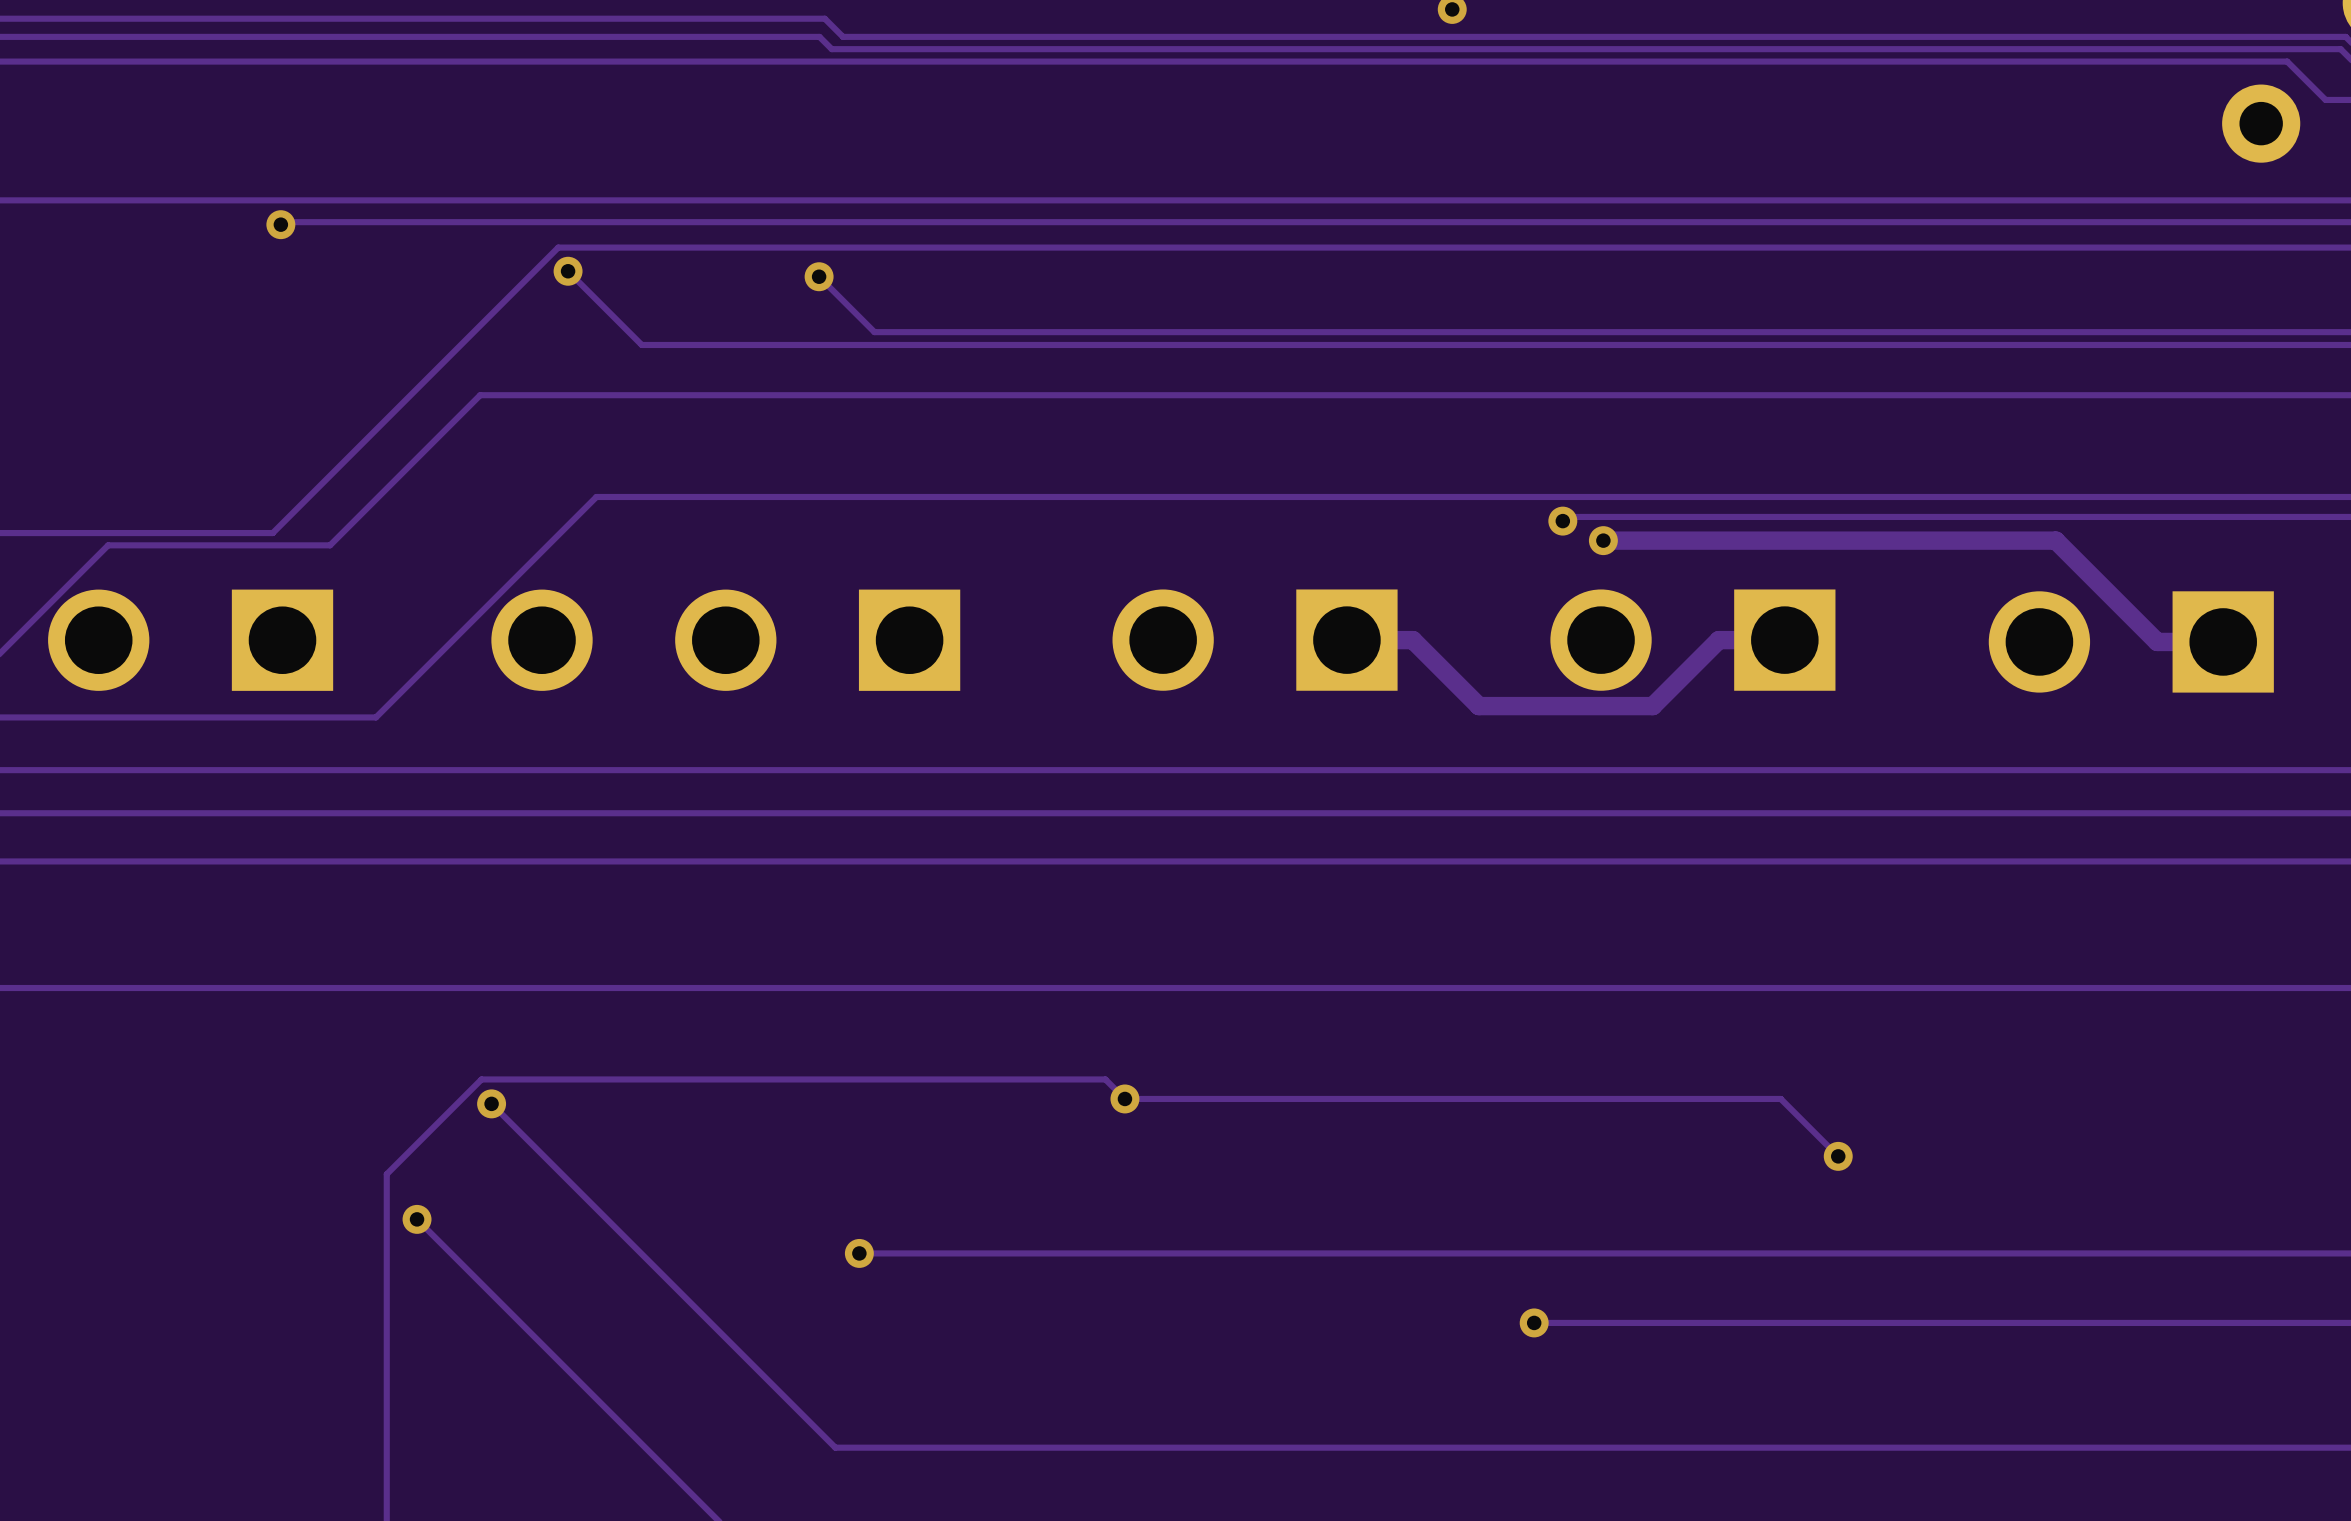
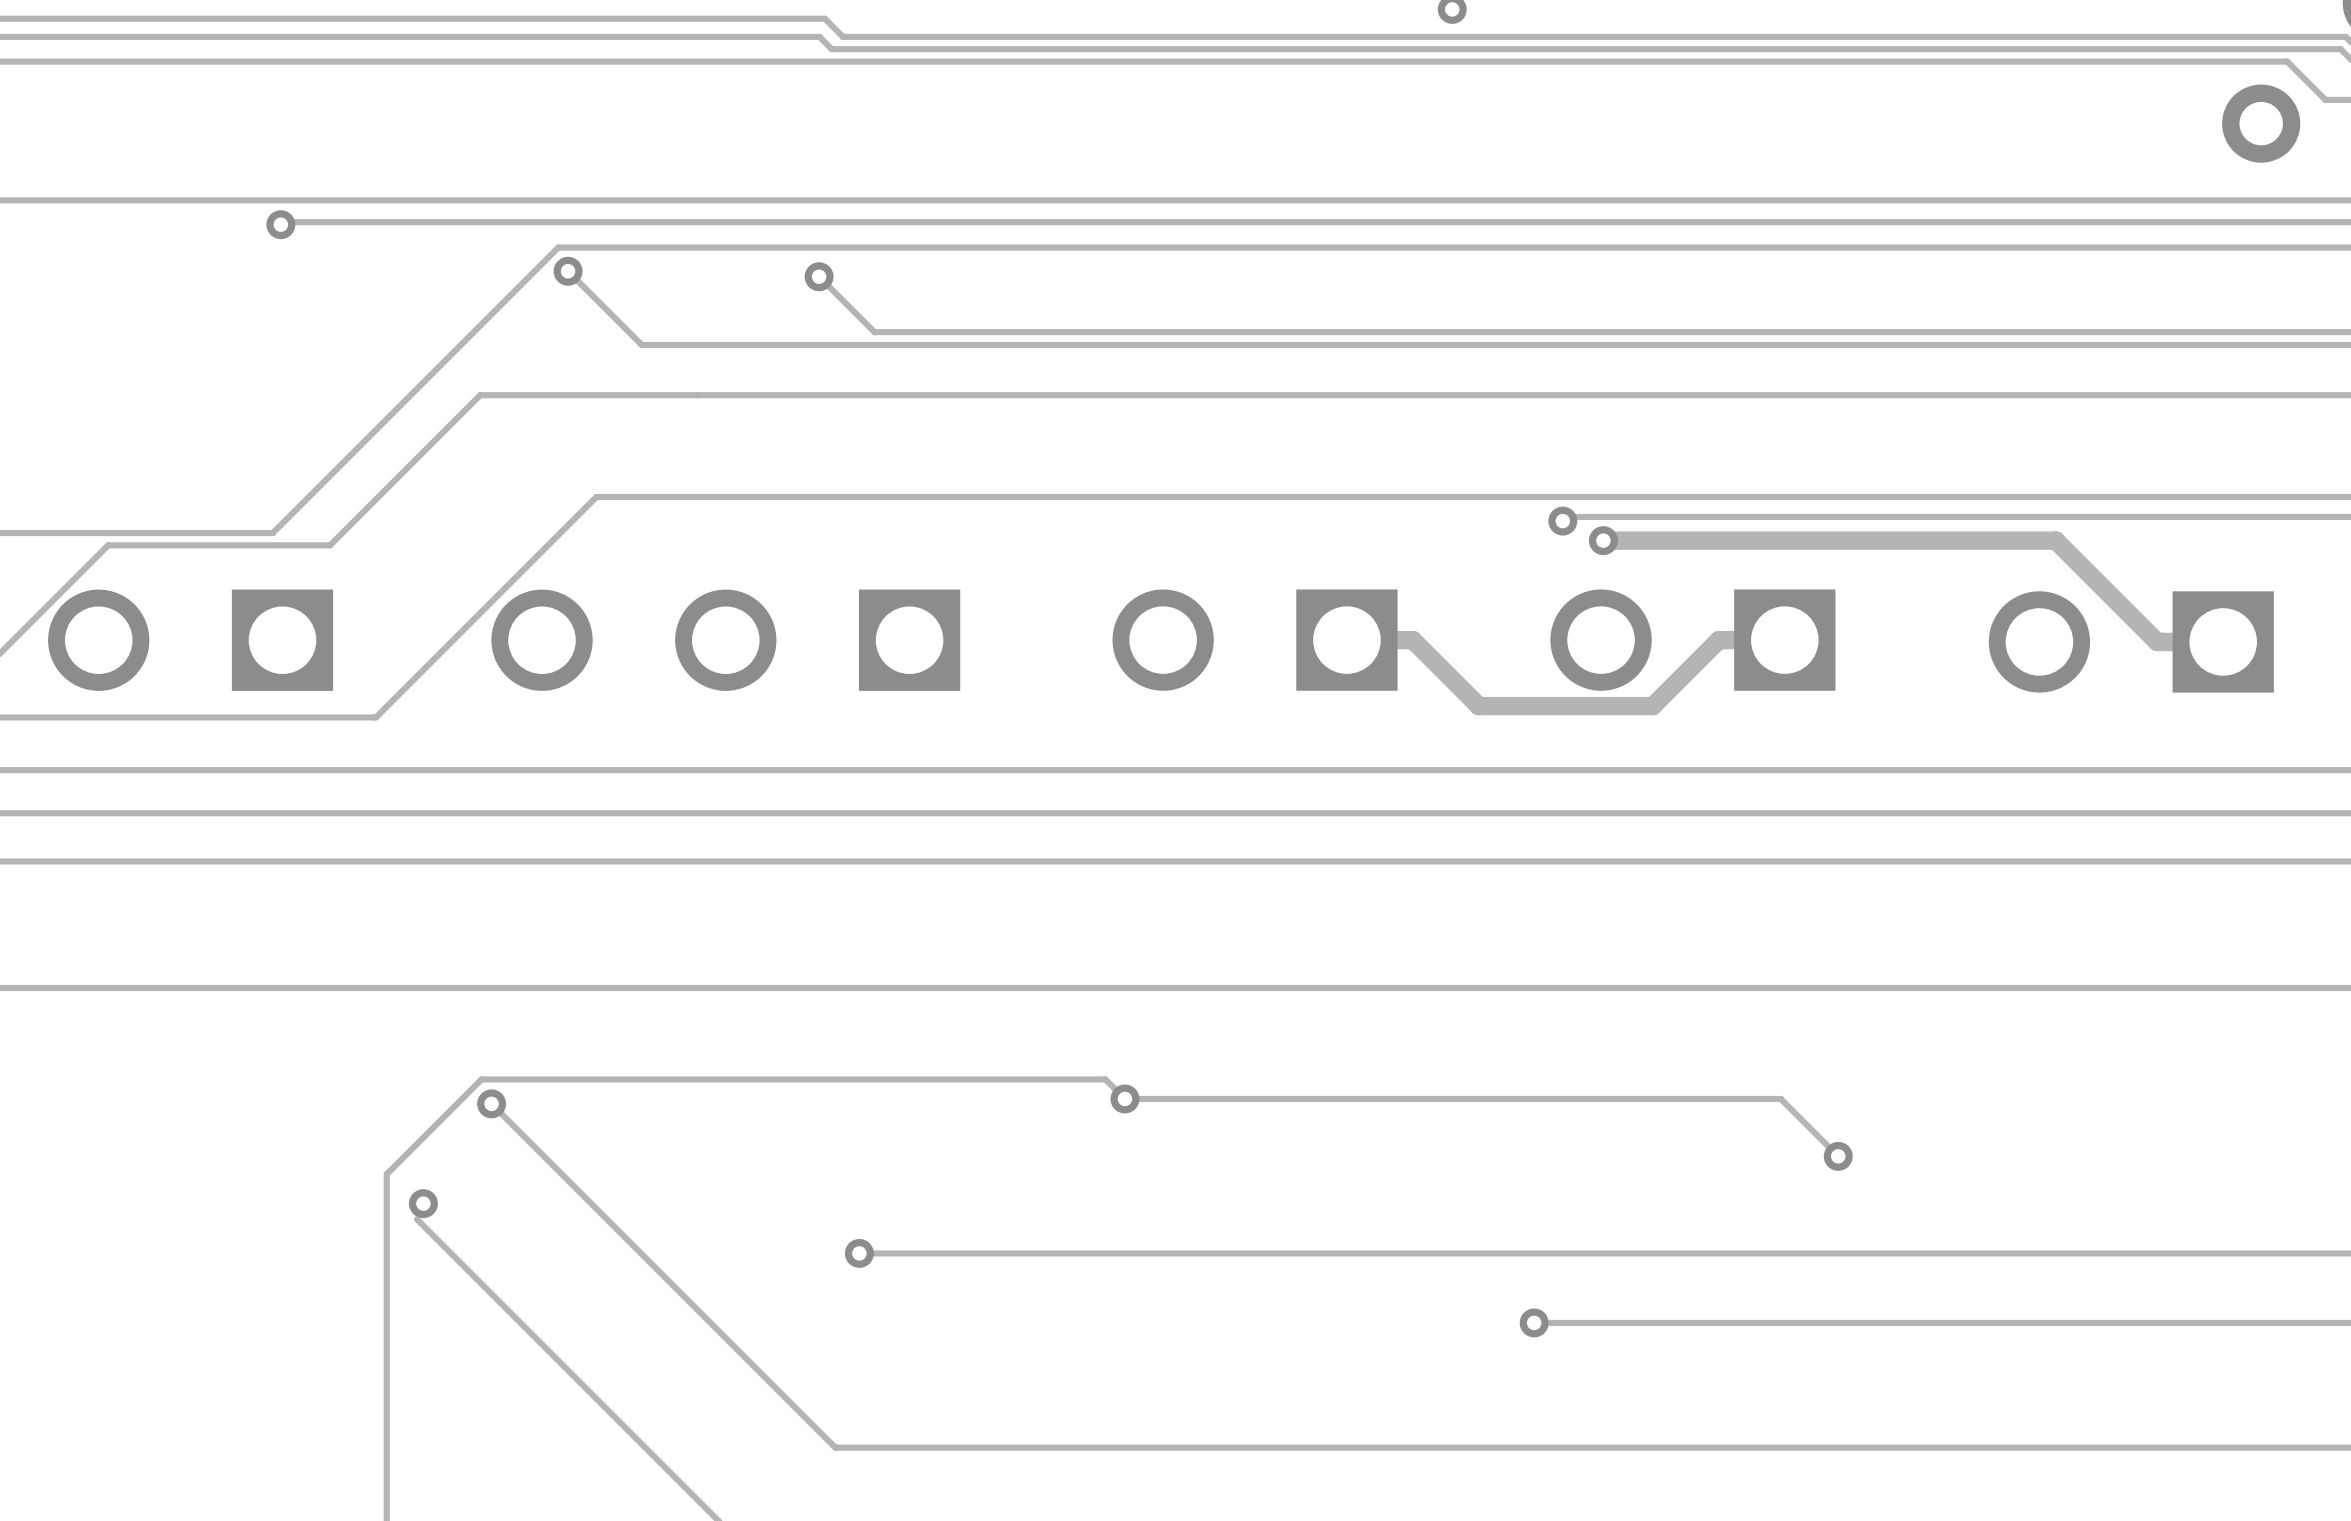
via position: (417, 1219) -> (423, 1203)

